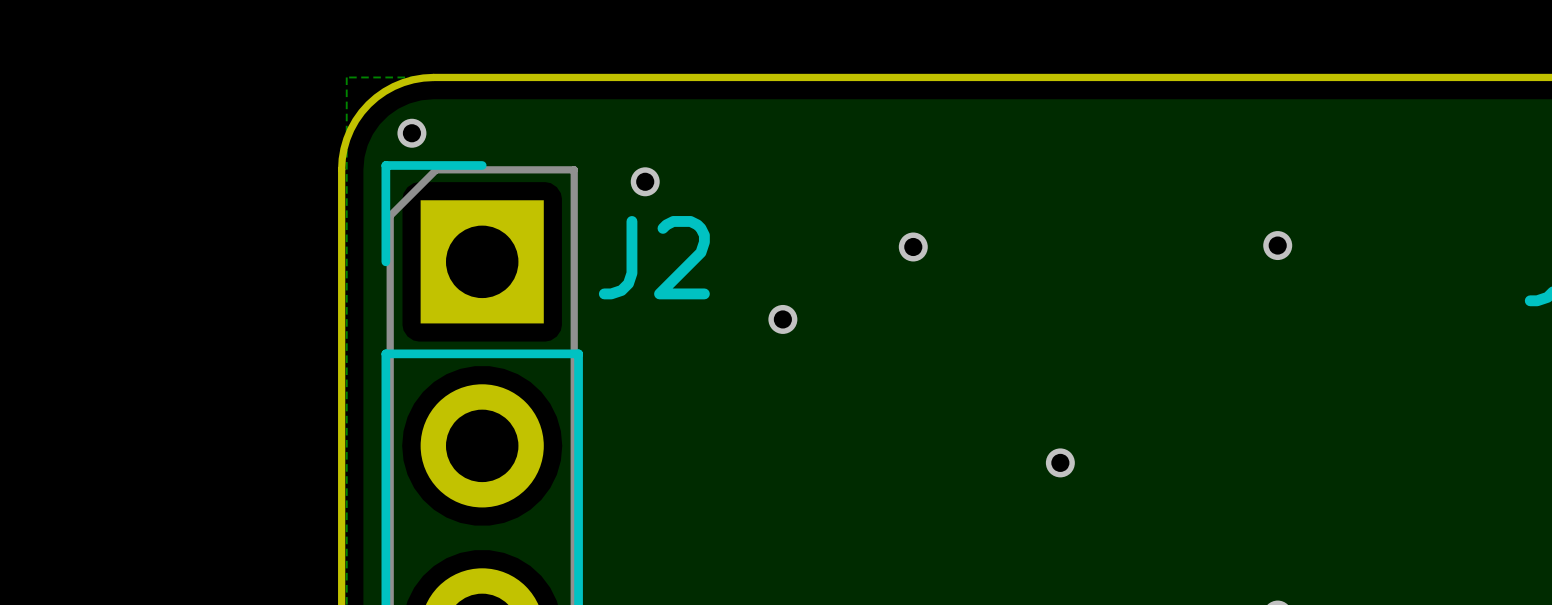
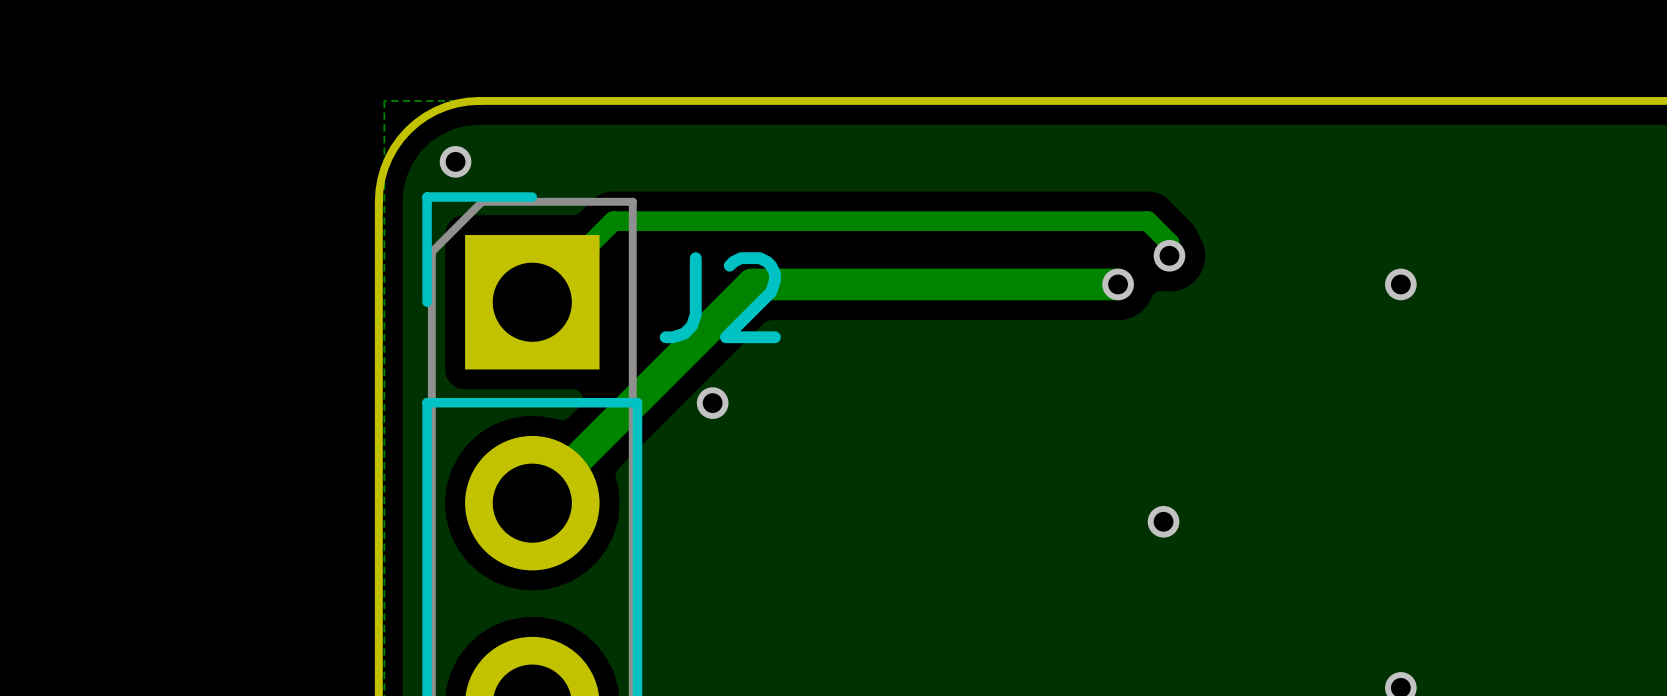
via: (645, 181) -> none
track: none -> (1169, 255) (1169, 242) (1147, 221) (613, 221) (532, 302)
via: none -> (1169, 255)
track: none -> (1118, 284) (752, 284) (533, 503)
via: none -> (1118, 284)
via: (913, 246) -> none
via: (782, 319) -> none
via: none -> (712, 403)

